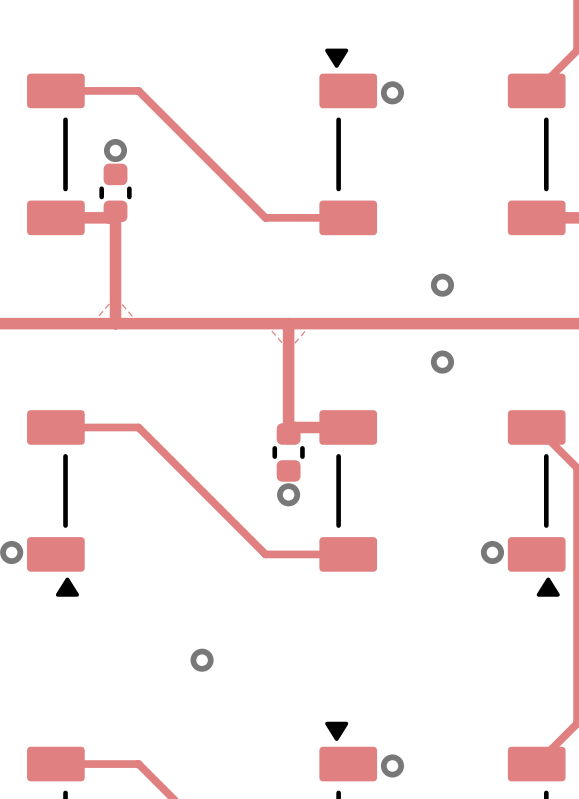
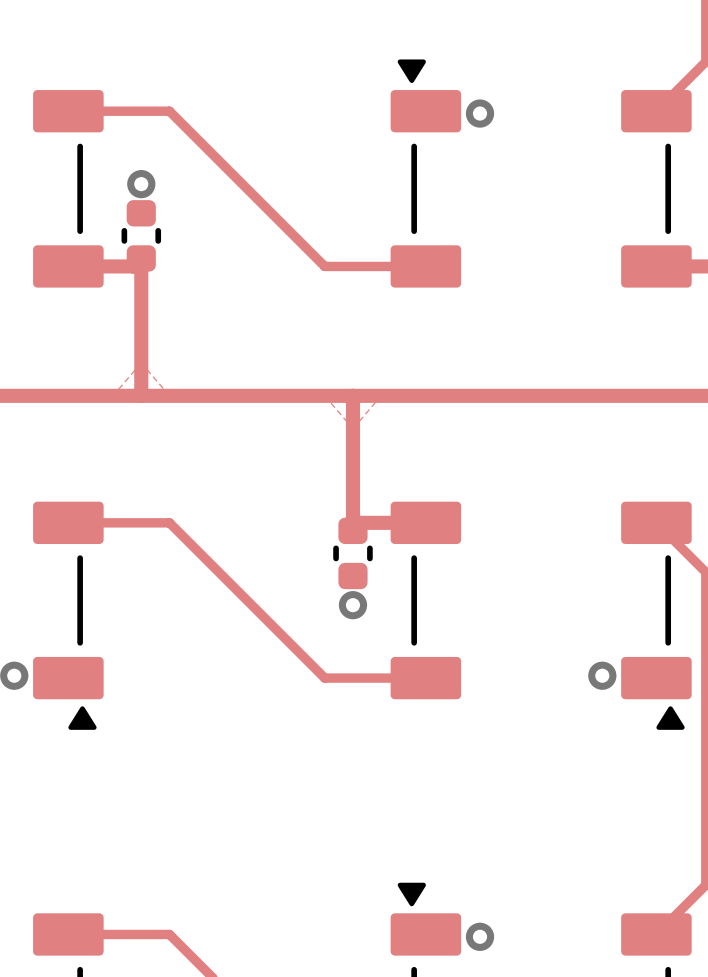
via: (442, 285) -> none
via: (442, 362) -> none
via: (202, 660) -> none

